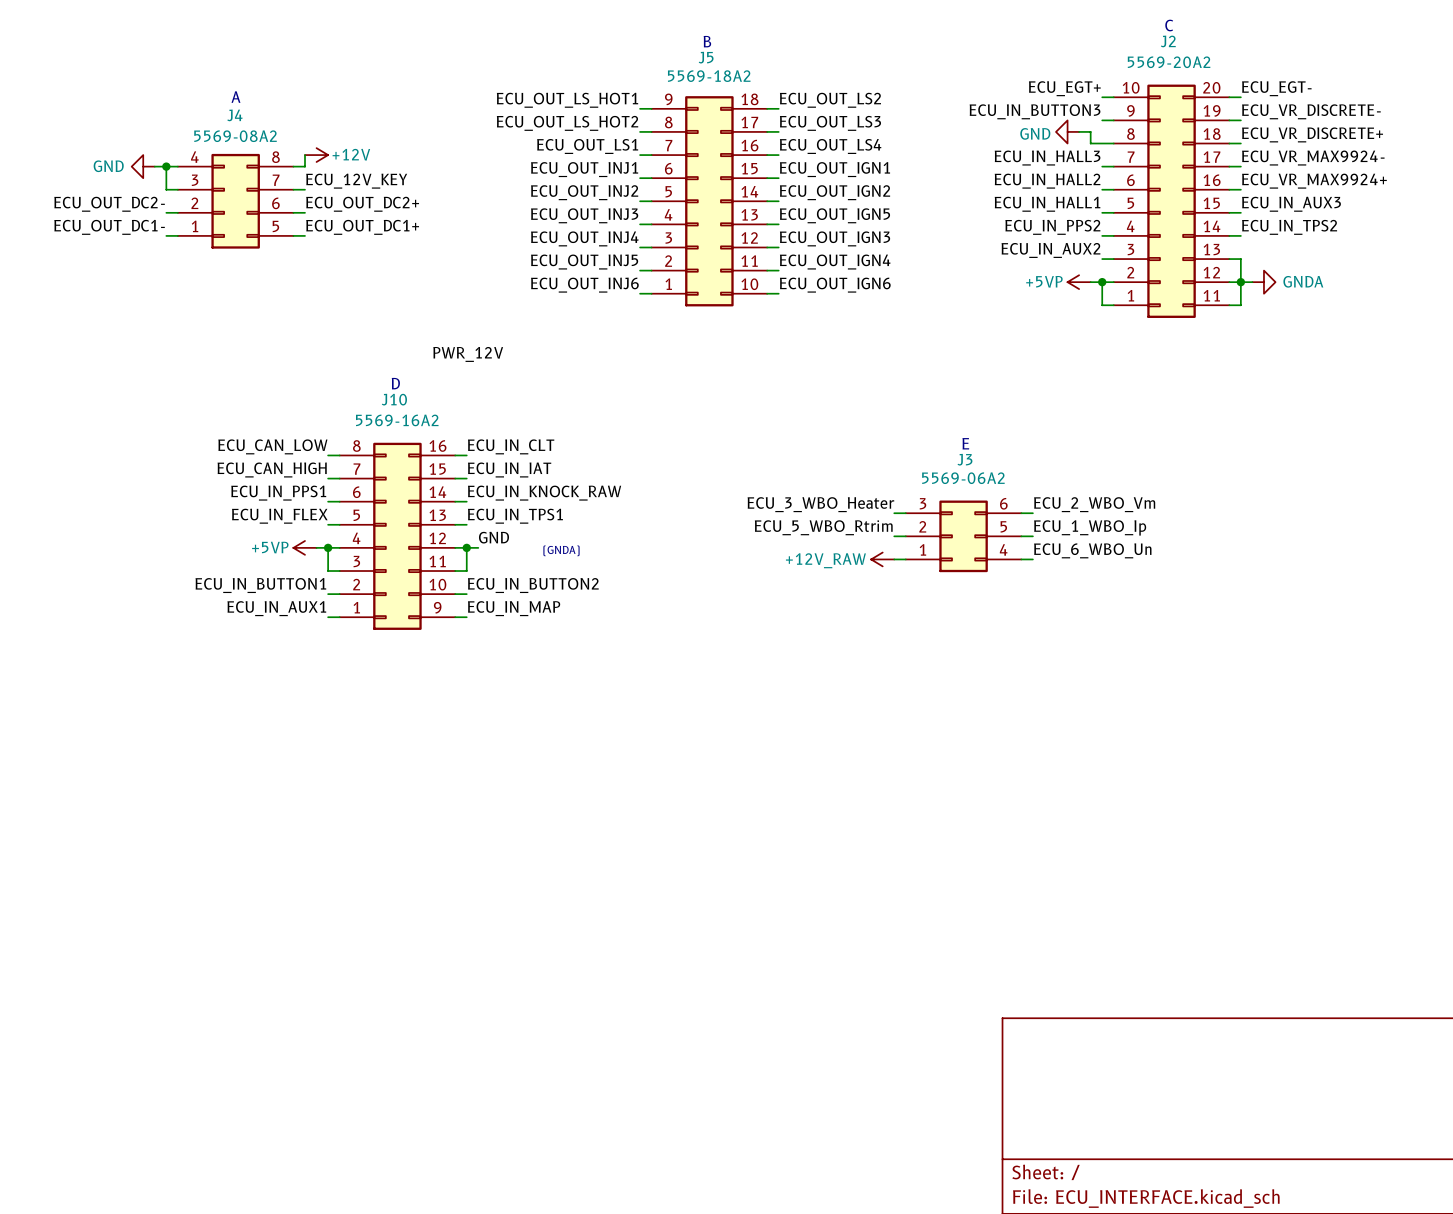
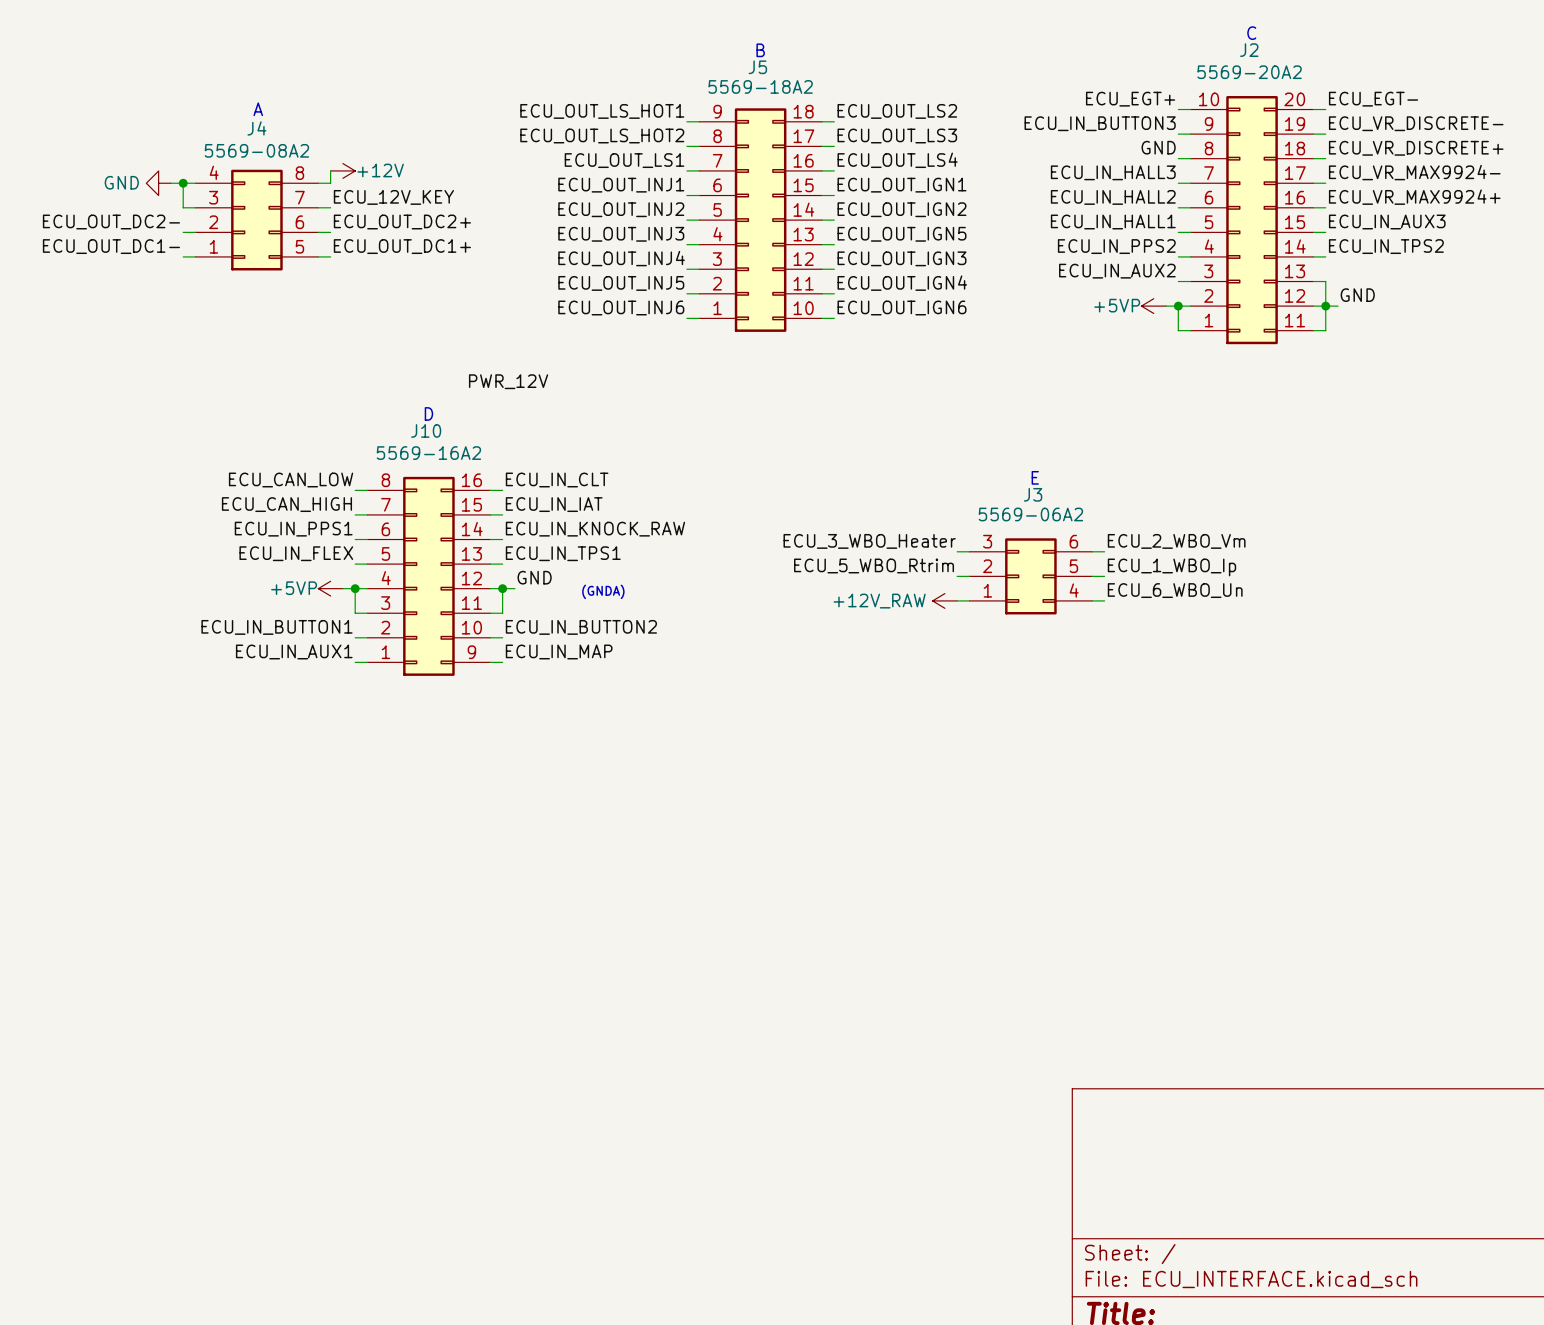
power symbol: GND (1067, 131) -> none
wire: (1079, 131) (1090, 131) (1090, 143) (1102, 143) -> none
label: none -> GND (1158, 147)
label: none -> GND (1357, 295)
power symbol: GNDA (1263, 282) -> none

